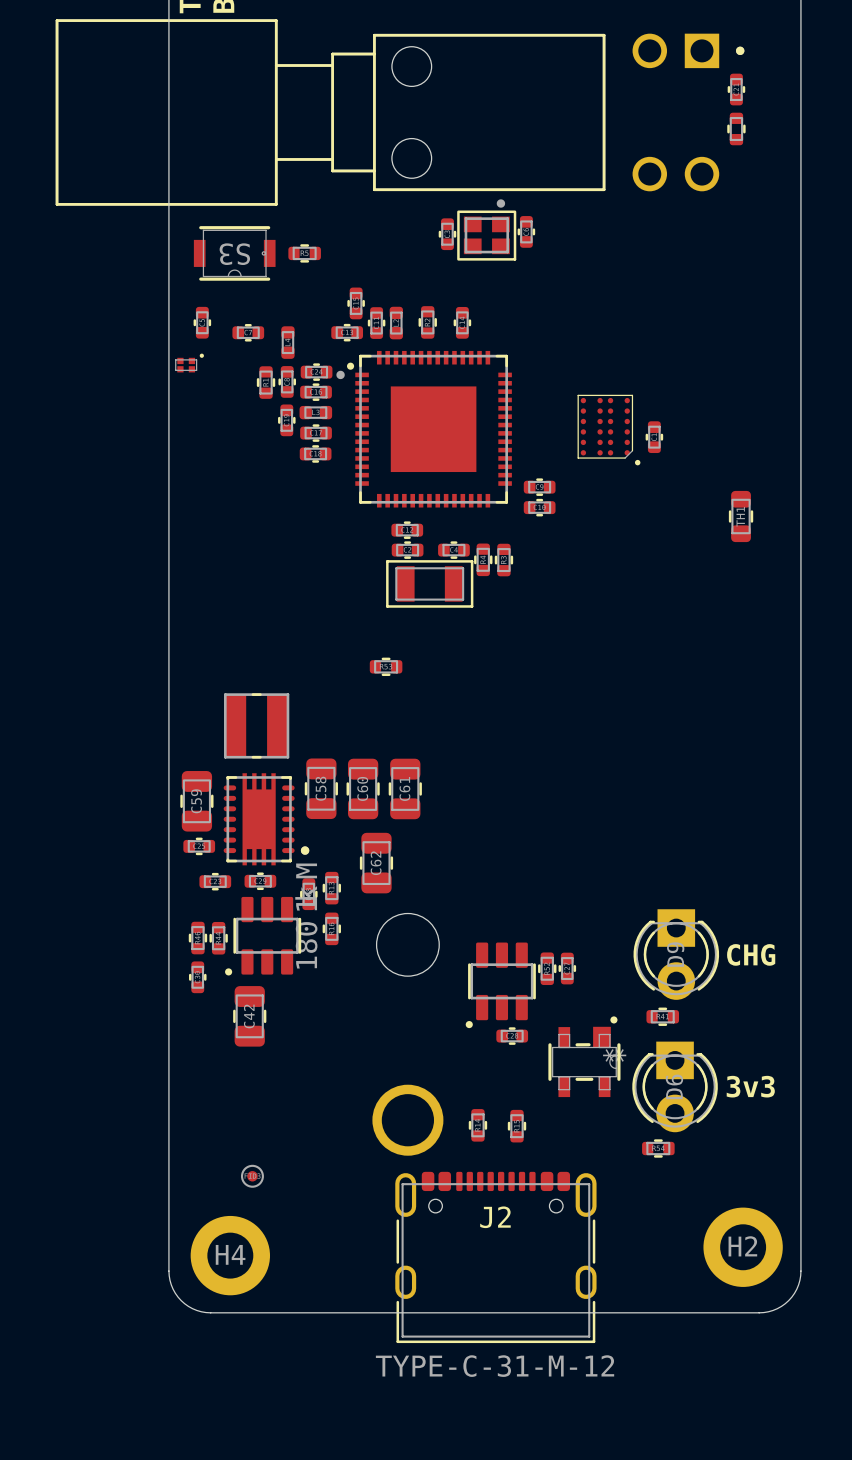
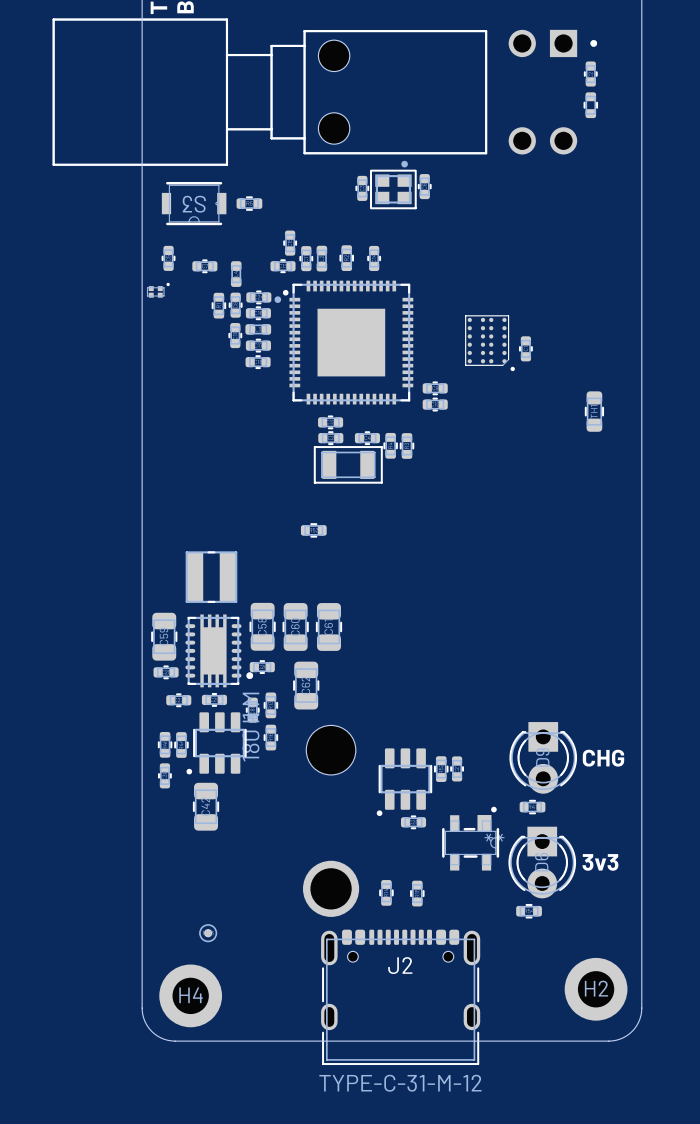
part: none -> (262, 667)

